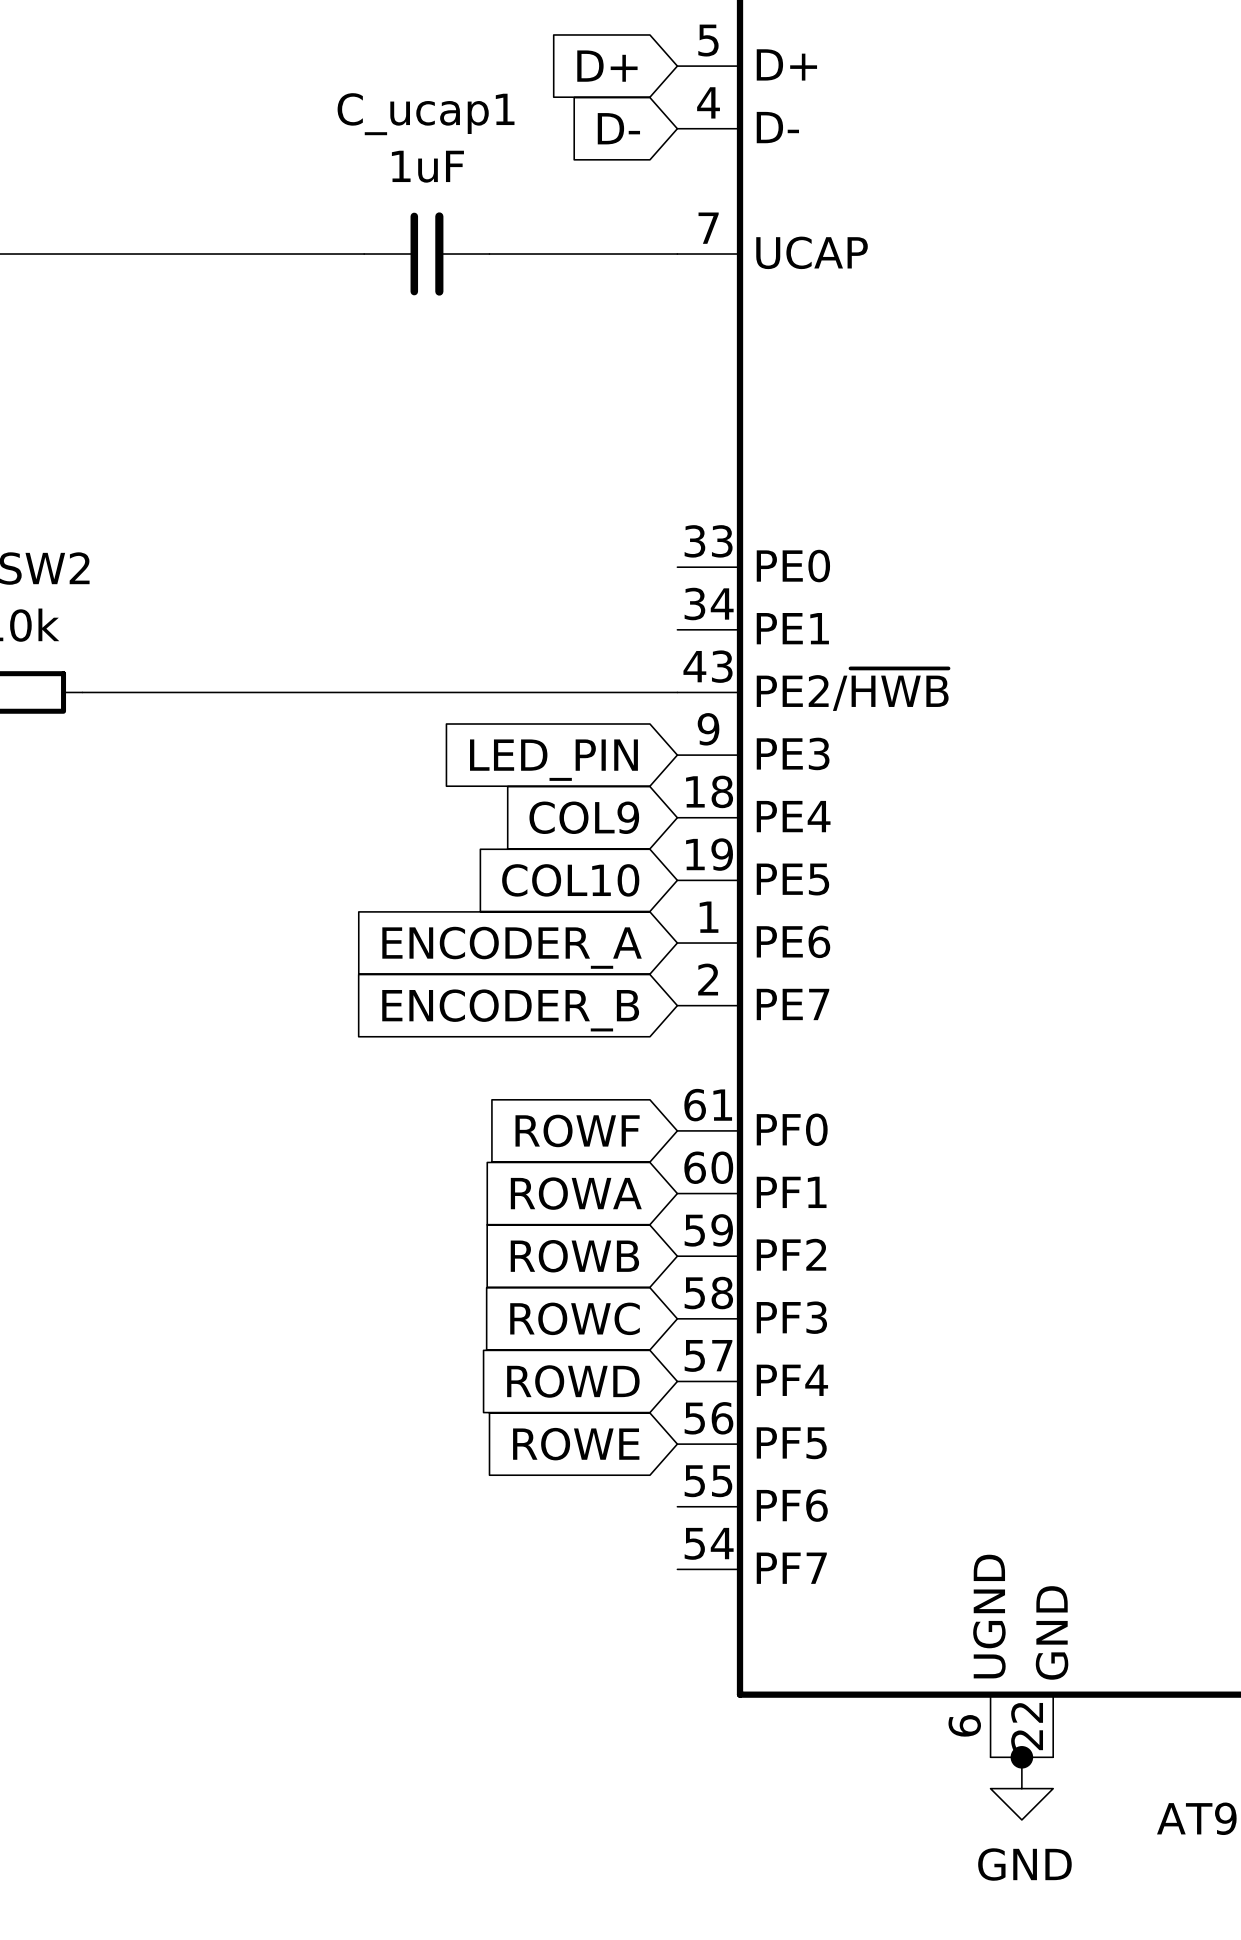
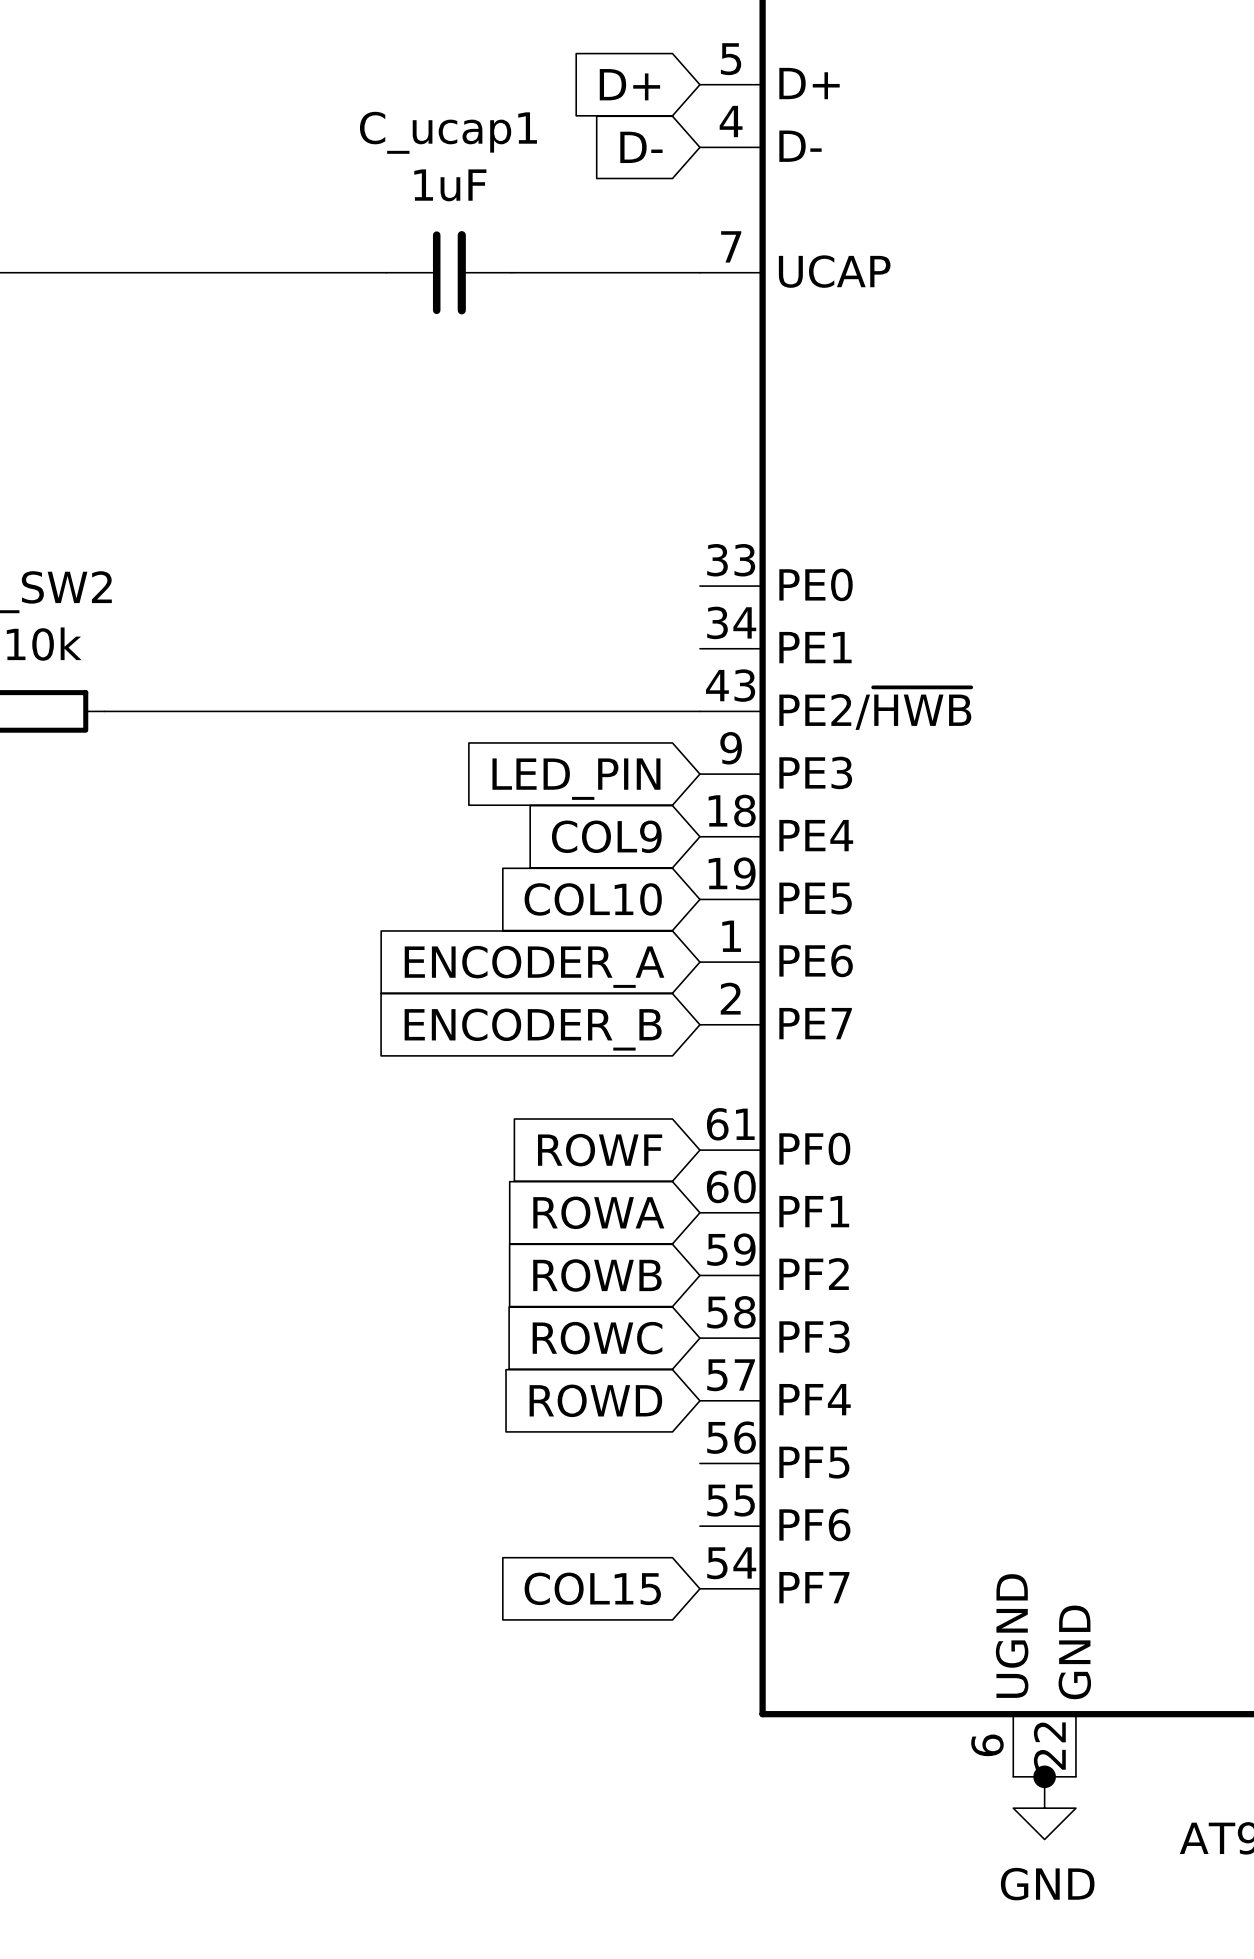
global label: ROWE (576, 1444) -> none
global label: none -> COL15 (592, 1588)

